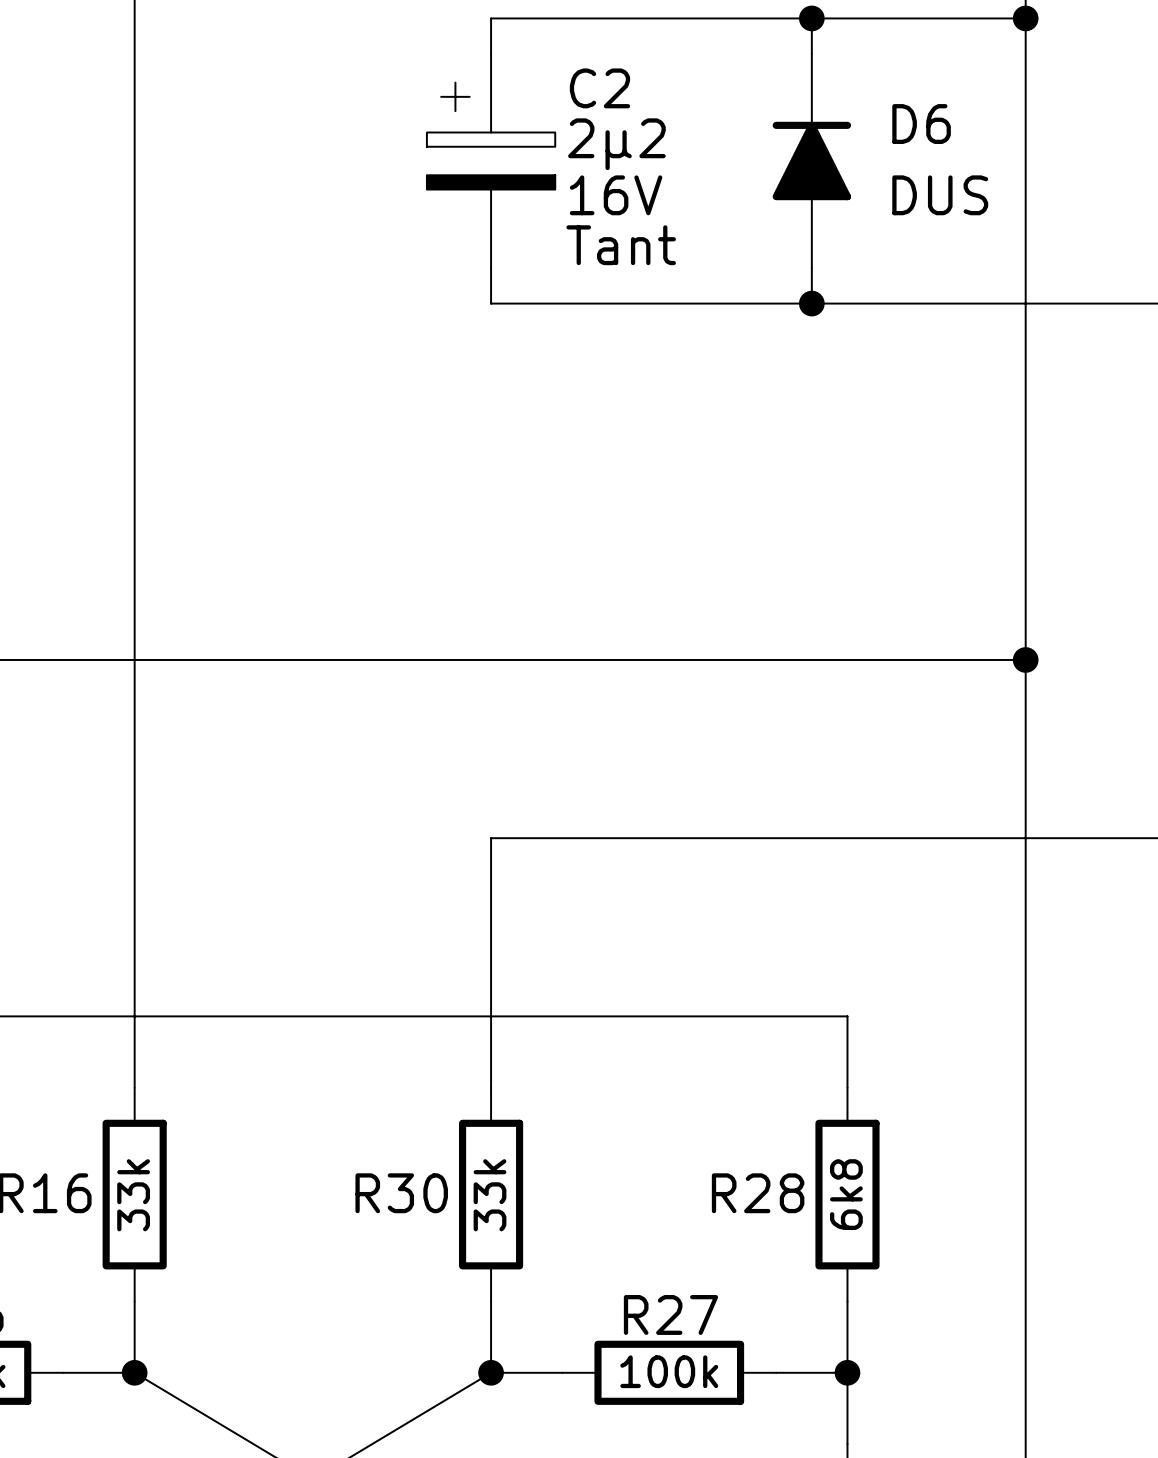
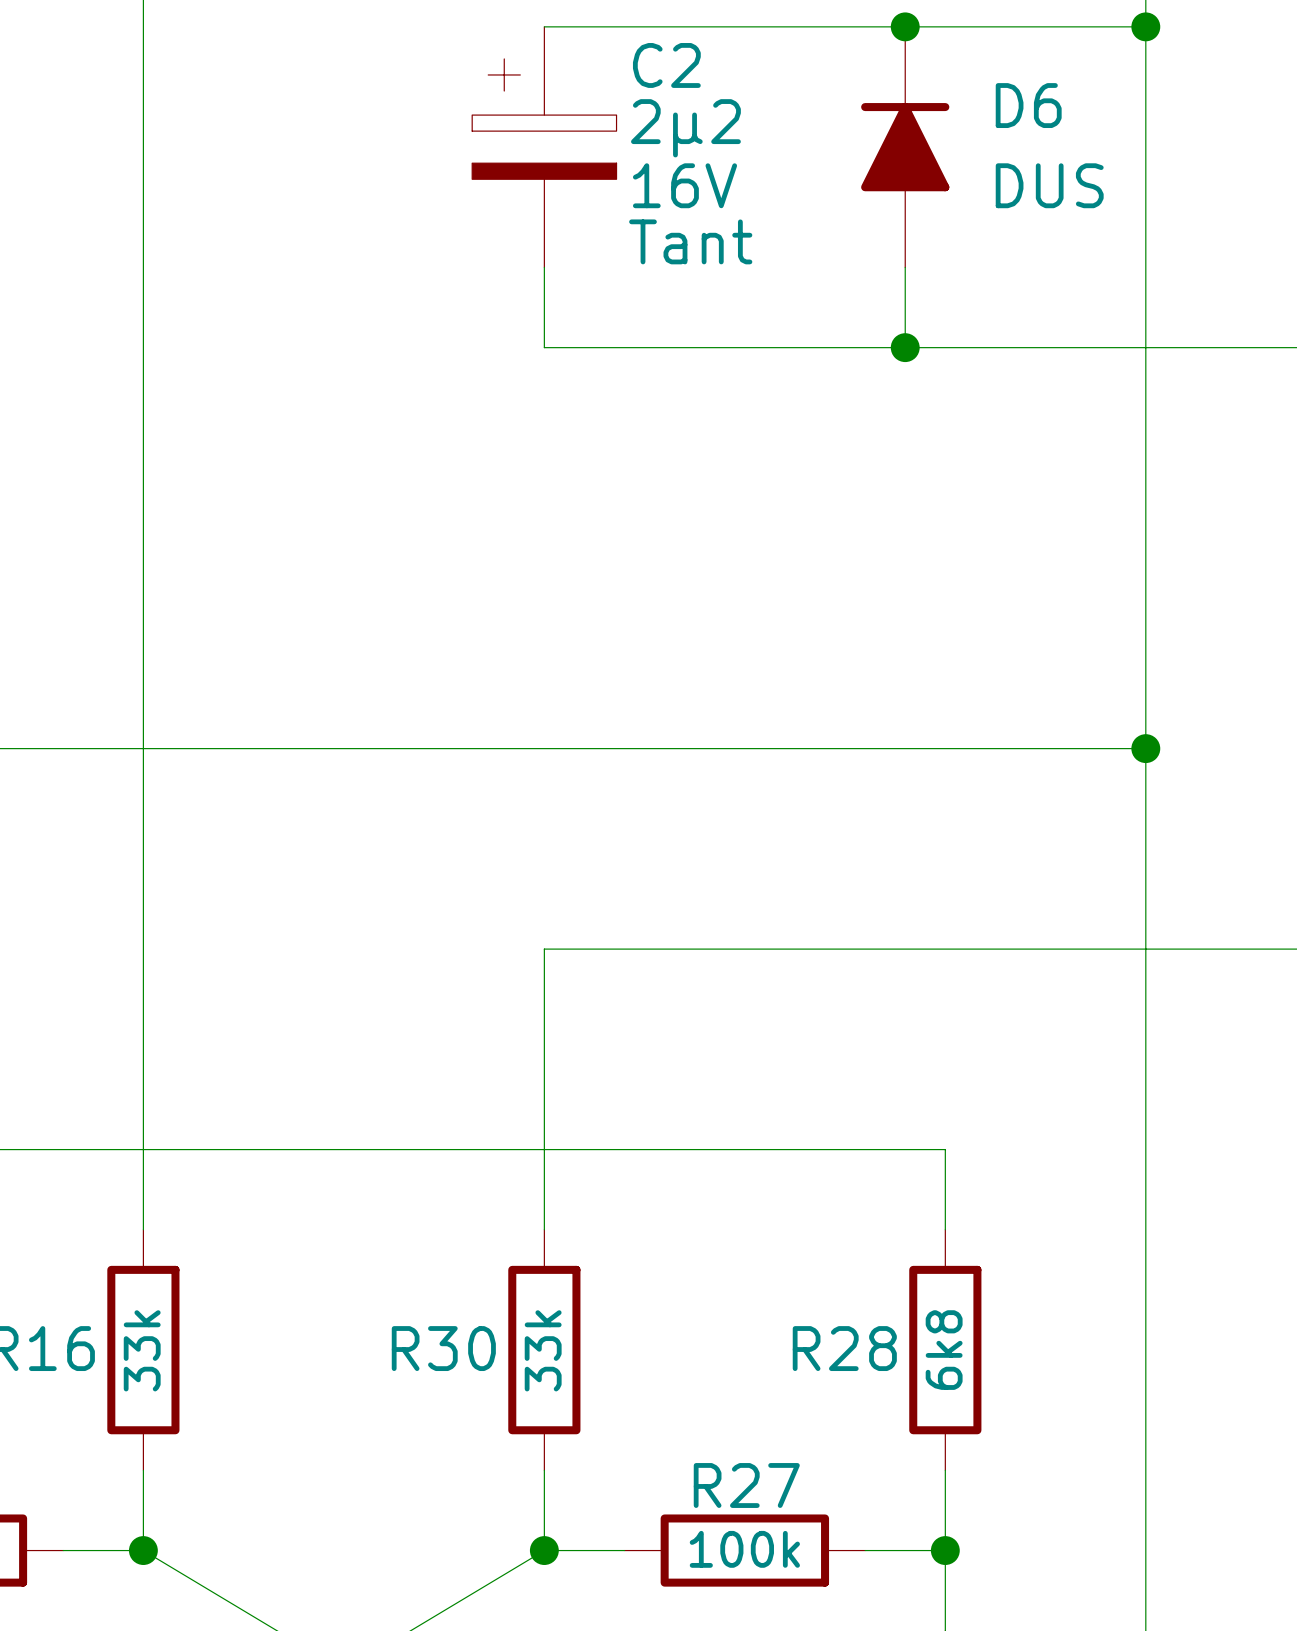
C2 position: (491, 161) -> (544, 147)
D6 position: (811, 161) -> (905, 147)

